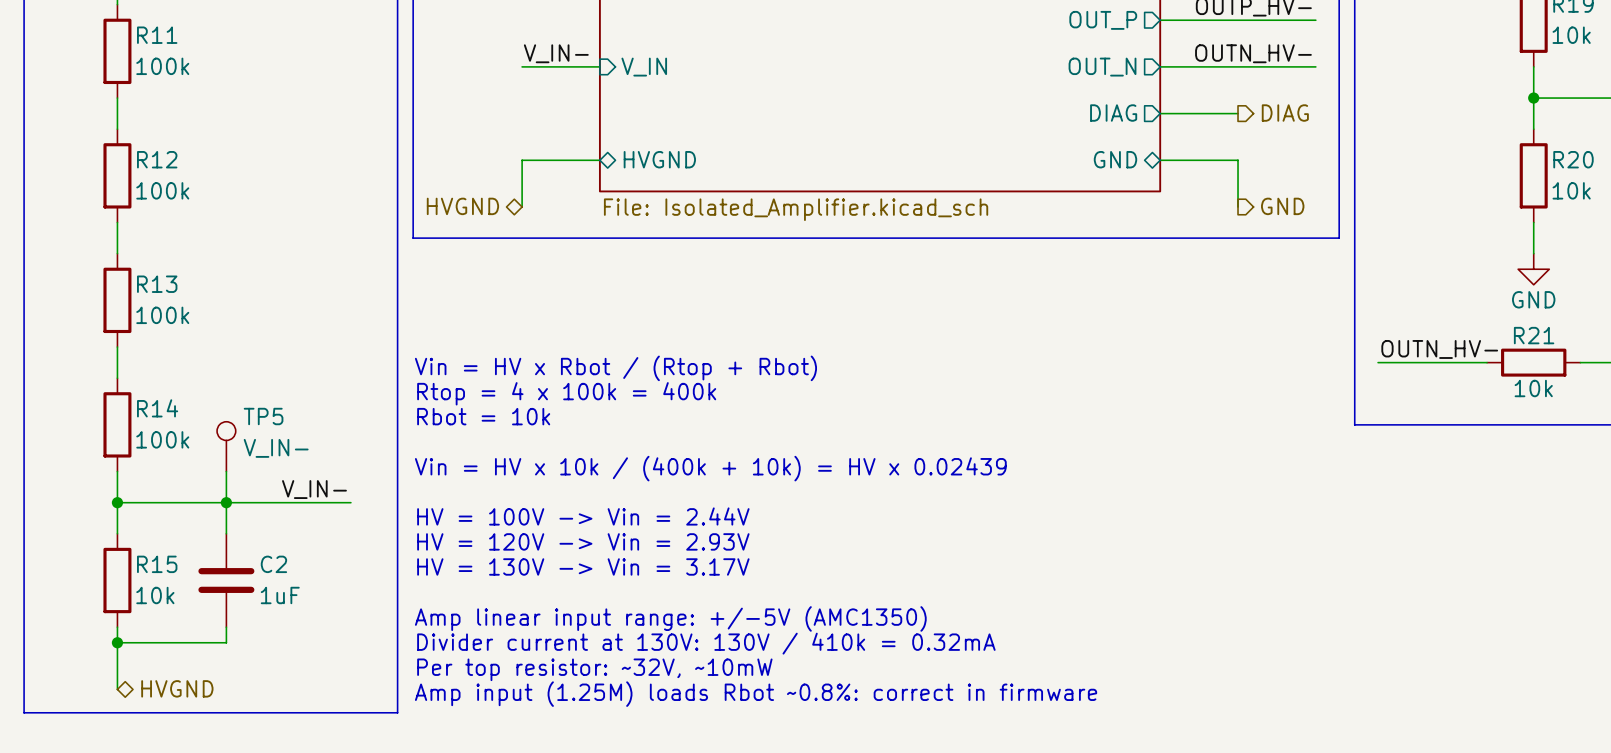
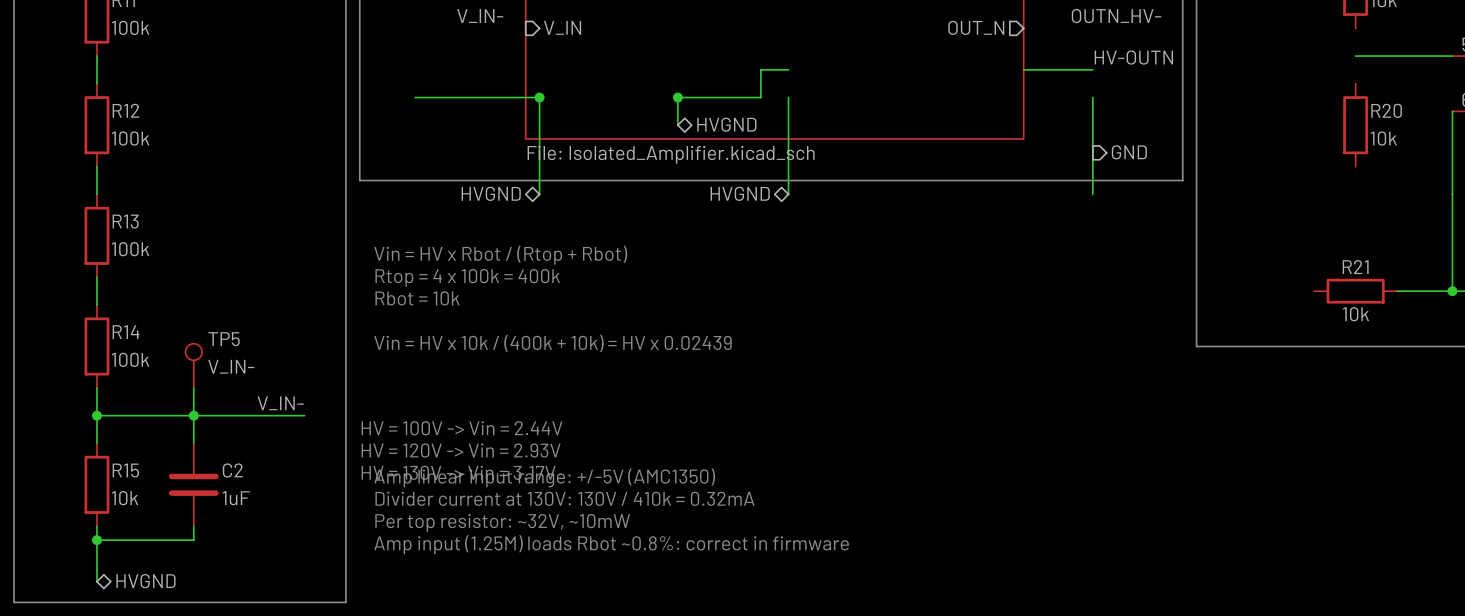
wire: (522, 66) (599, 66) -> none
wire: (1160, 66) (1315, 66) -> none
wire: (1533, 66) (1533, 129) -> none
junction: (1533, 98) -> none
label: none -> HV-OUTN (1133, 57)
wire: none -> (788, 69) (760, 69) (760, 97) (677, 97) (677, 125)
sheet pin: DIAG (1113, 113) -> none
hierarchical label: DIAG (1285, 113) -> none
wire: none -> (415, 97) (539, 97) (539, 194)
junction: none -> (539, 97)
junction: none -> (677, 97)
wire: none -> (788, 97) (788, 194)
sheet pin: HVGND (659, 159) -> none
sheet pin: GND (1115, 159) -> none
wire: (599, 160) (522, 160) (522, 206) -> none
wire: (1160, 160) (1238, 160) -> (1092, 97) (1092, 111)
hierarchical label: none -> HVGND (726, 124)
hierarchical label position: HVGND (462, 206) -> HVGND (491, 193)
wire: none -> (1092, 152) (1092, 194)
wire: (1533, 222) (1533, 253) -> none
hierarchical label: none -> HVGND (740, 193)
power symbol: GND (1533, 269) -> none
label: OUTN_HV- (1439, 349) -> none
wire: (1378, 362) (1487, 362) -> none
text position: Vin = HV x Rbot / (Rtop + Rbot) (615, 368) -> Vin = HV x Rbot / (Rtop + Rbot) (500, 255)
text position: Rtop = 4 x 100k = 400k (566, 393) -> Rtop = 4 x 100k = 400k (467, 277)
text position: Rbot = 10k (483, 416) -> Rbot = 10k (417, 298)
text position: Vin = HV x 10k / (400k + 10k) = HV x 0.02439 (710, 468) -> Vin = HV x 10k / (400k + 10k) = HV x 0.02439 (553, 343)
text position: Amp linear input range: +/-5V (AMC1350) (670, 618) -> Amp linear input range: +/-5V (AMC1350) (544, 477)
text position: Divider current at 130V: 130V / 410k = 0.32mA (706, 643) -> Divider current at 130V: 130V / 410k = 0.32mA (564, 498)
text position: Per top resistor: ~32V, ~10mW (594, 669) -> Per top resistor: ~32V, ~10mW (502, 522)
text position: Amp input (1.25M) loads Rbot ~0.8%: correct in firmware (756, 694) -> Amp input (1.25M) loads Rbot ~0.8%: correct in firmware (611, 544)

